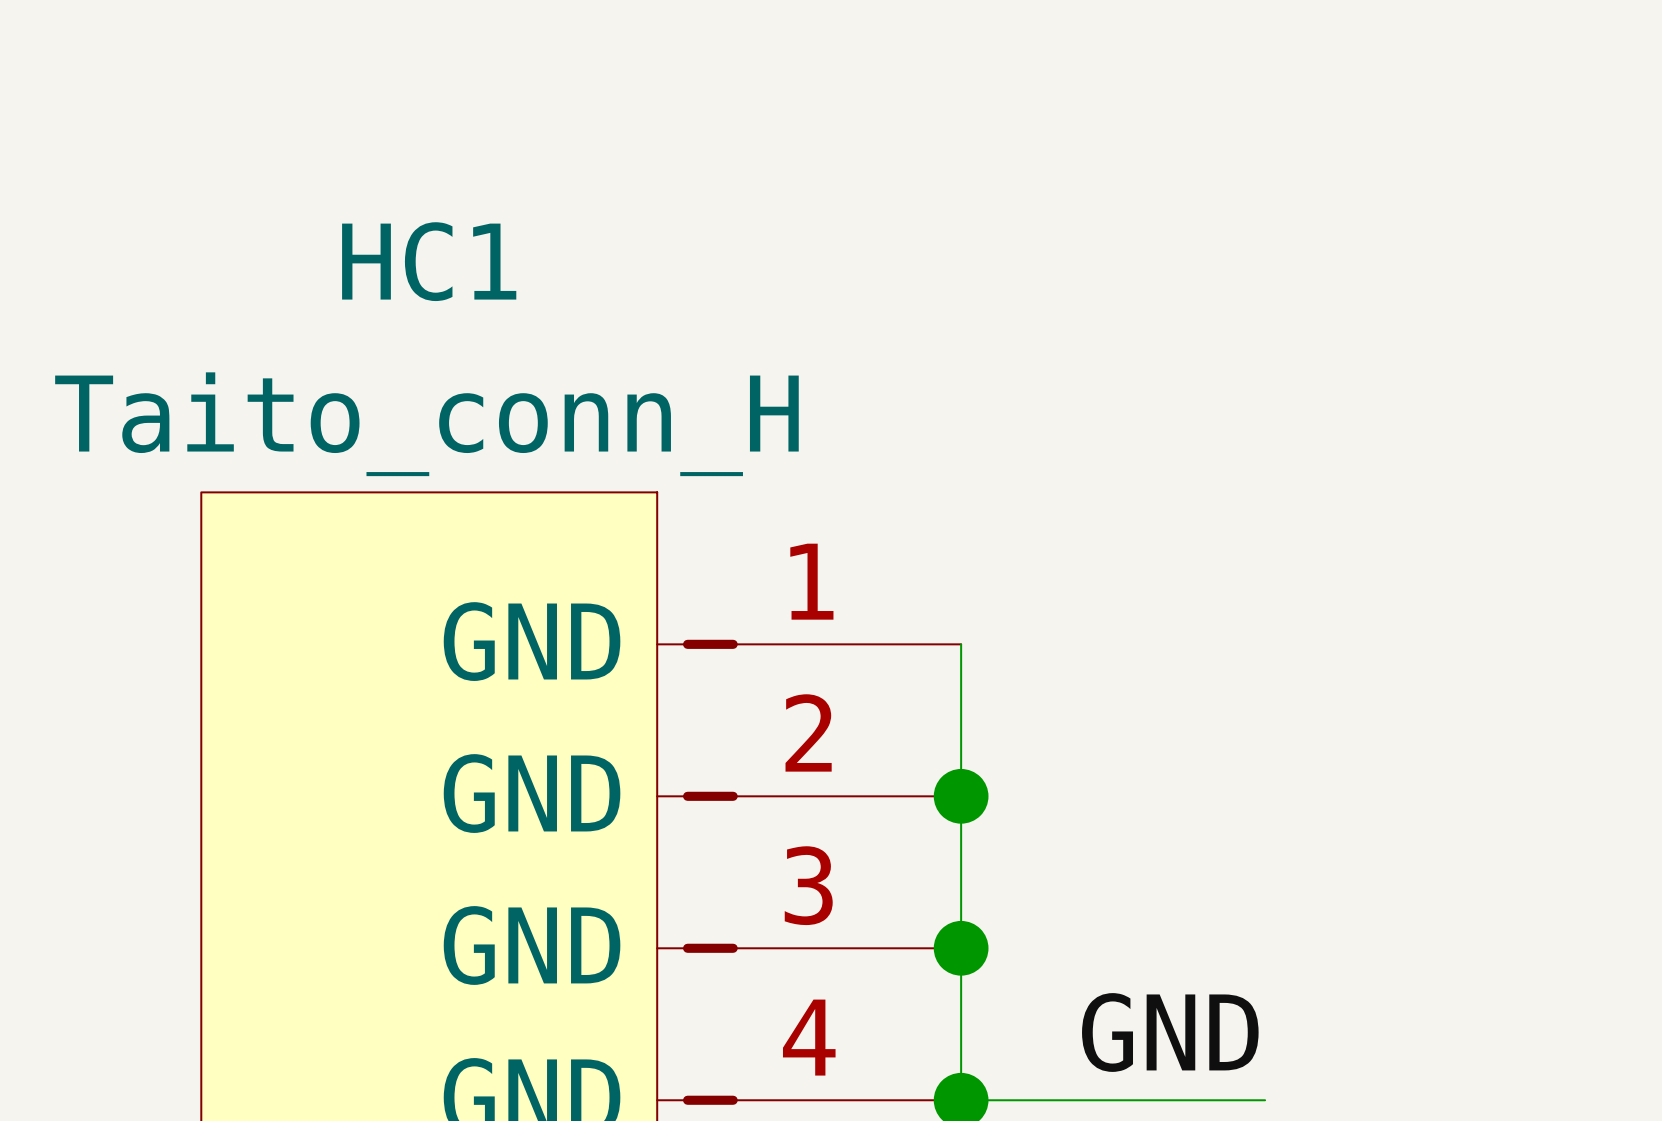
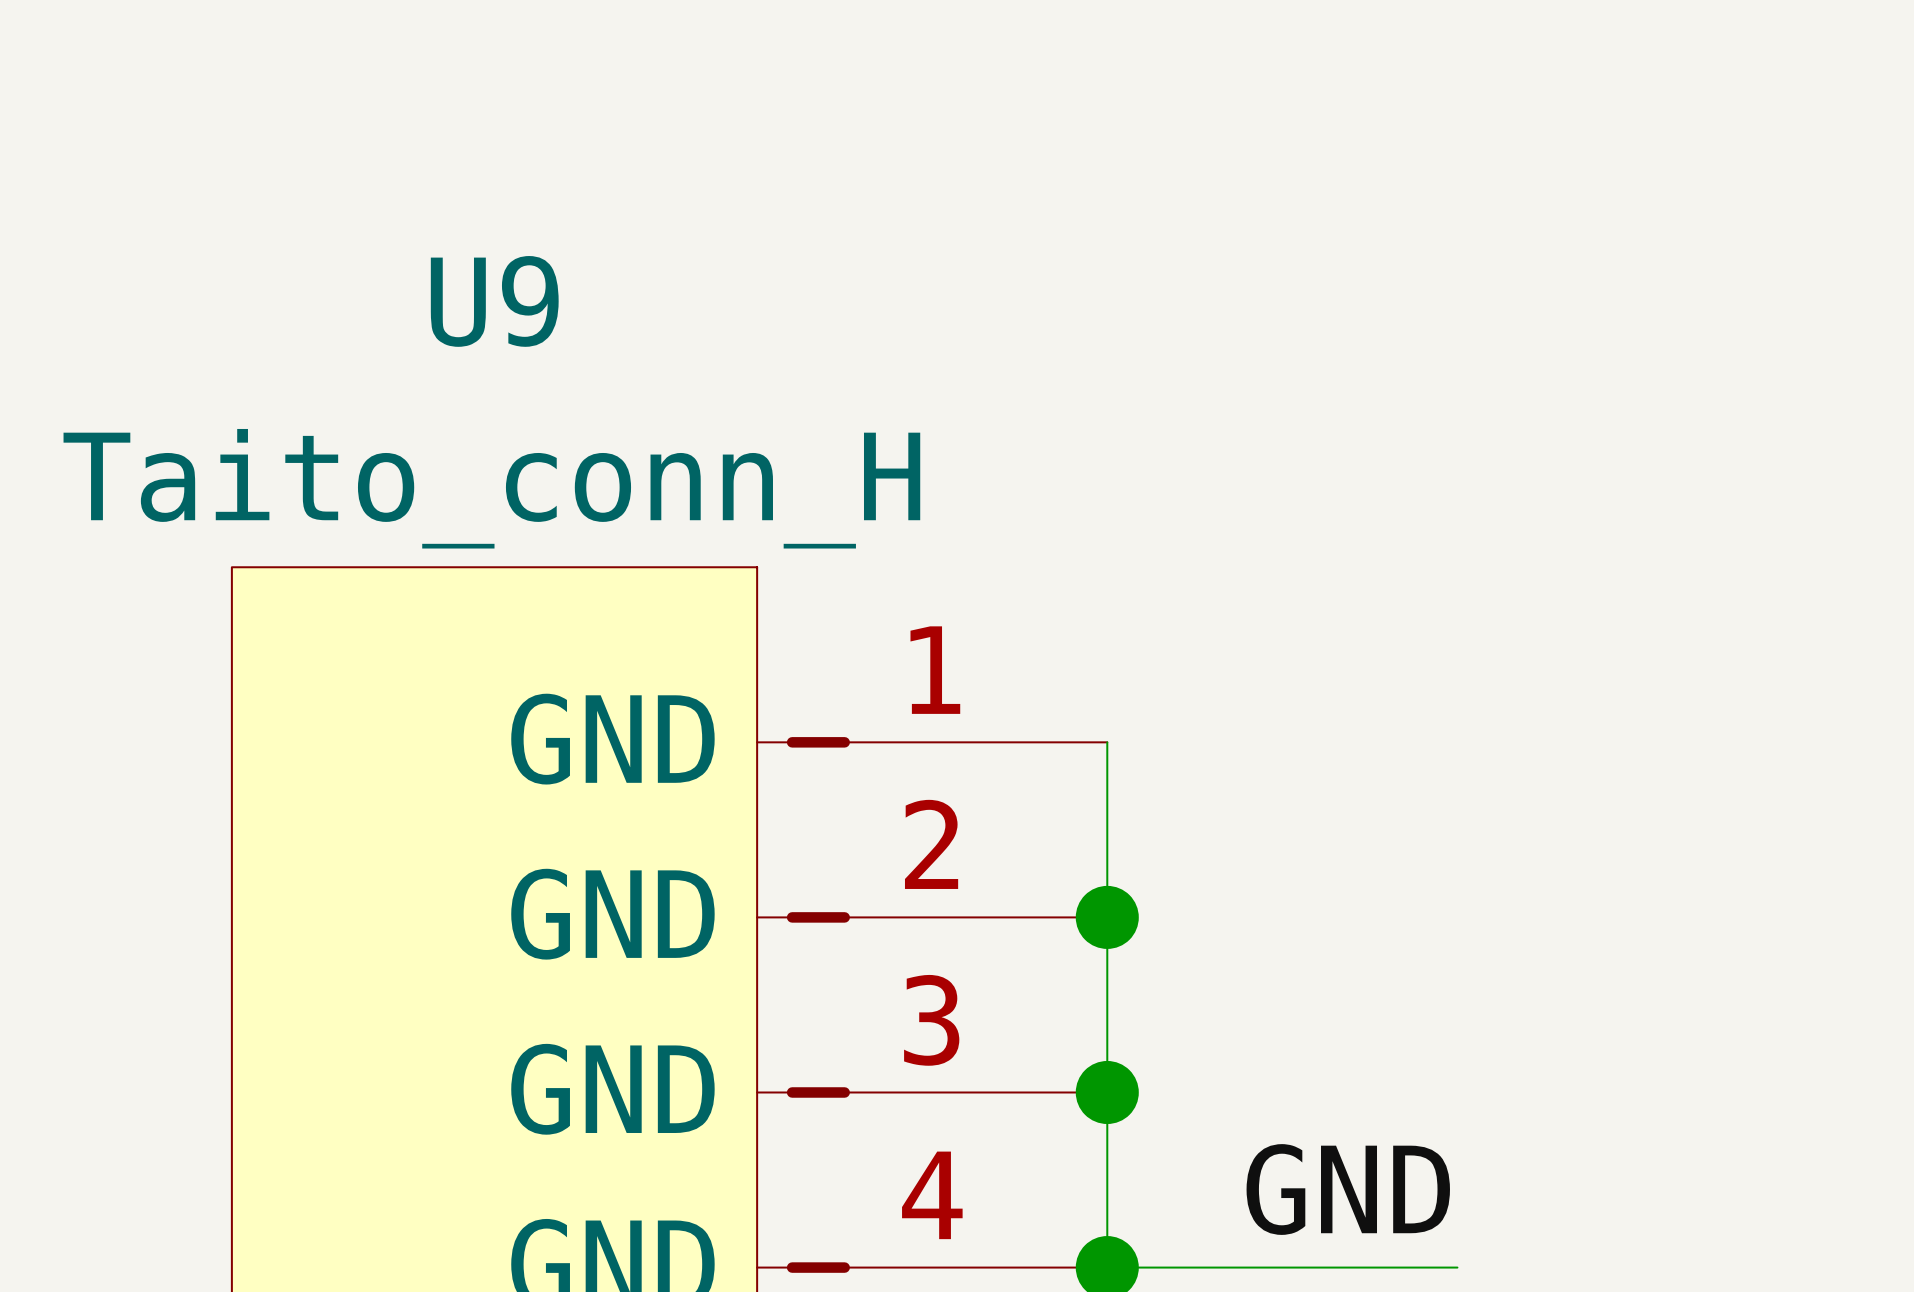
HC1 name: HC1 (429, 261) -> U9 (494, 301)

